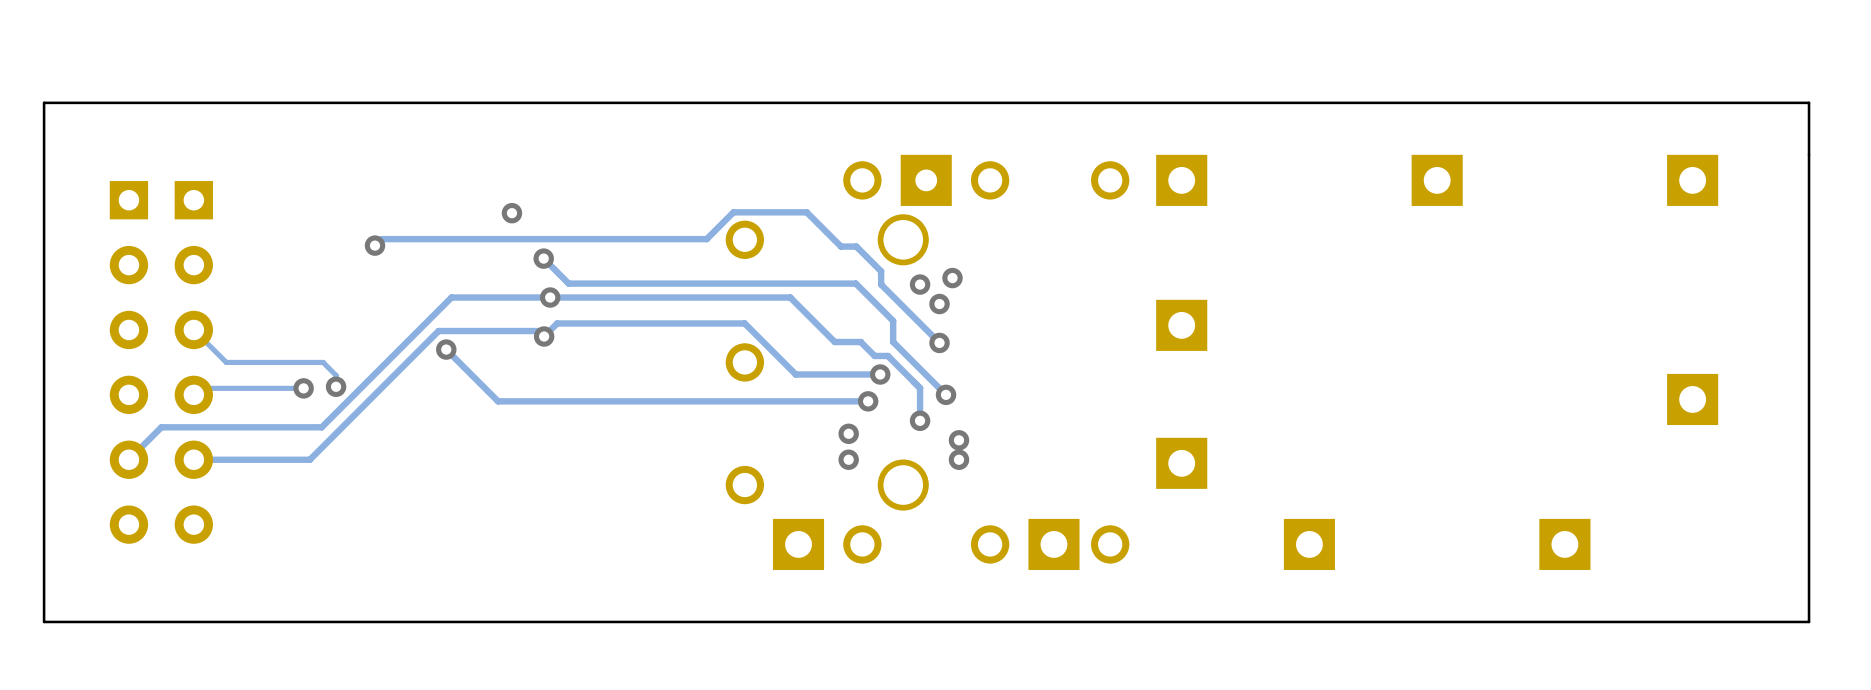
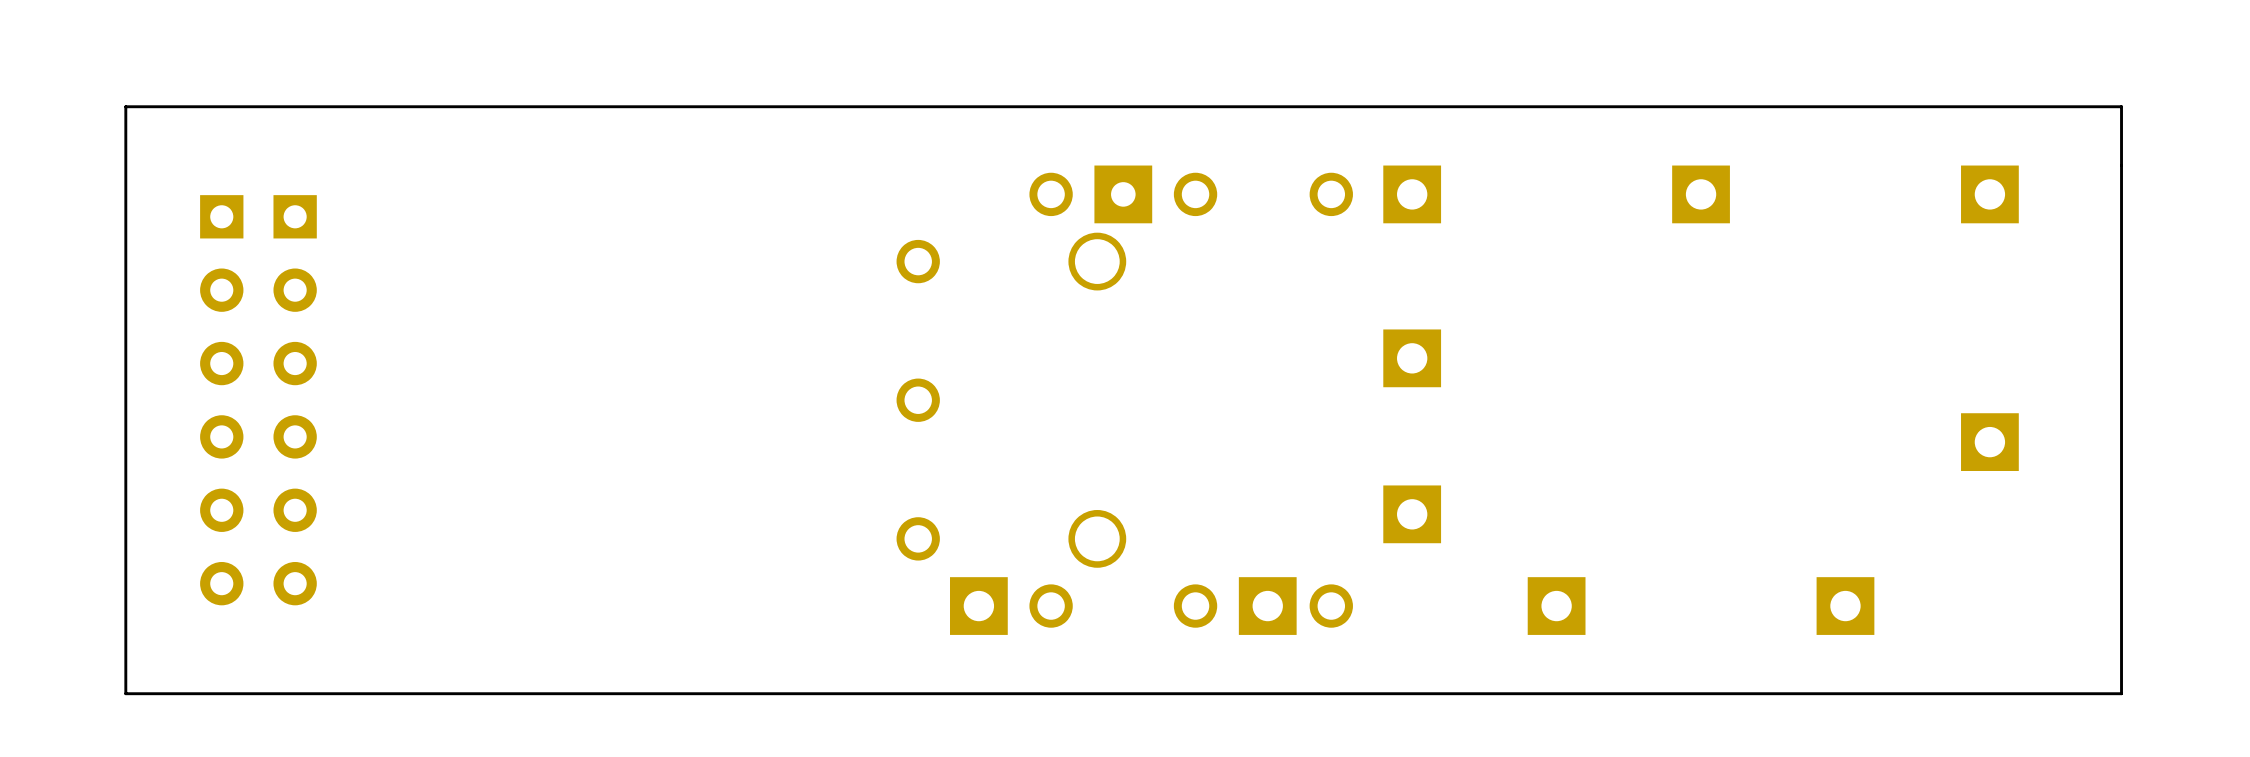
via: (511, 213) -> none
track: (375, 245) (381, 239) (706, 239) (733, 212) (806, 212) (841, 246) (856, 246) (881, 271) (881, 284) (939, 342) -> none
via: (375, 245) -> none
track: (543, 258) (568, 283) (855, 283) (893, 320) (893, 342) (946, 394) -> none
via: (543, 258) -> none
via: (952, 278) -> none
via: (920, 284) -> none
via: (550, 297) -> none
via: (939, 304) -> none
track: (193, 329) (226, 362) (323, 362) (336, 375) (336, 386) -> none
via: (544, 336) -> none
via: (939, 342) -> none
track: (446, 349) (498, 401) (868, 401) -> none
via: (446, 349) -> none
track: (880, 374) (795, 374) (744, 323) (557, 323) (544, 336) (538, 331) (438, 331) (309, 459) (193, 459) -> none
via: (880, 374) -> none
via: (336, 386) -> none
track: (303, 388) (200, 388) (193, 394) -> none
via: (303, 388) -> none
via: (946, 394) -> none
via: (868, 401) -> none
track: (920, 420) (920, 388) (887, 355) (874, 355) (860, 342) (834, 342) (790, 297) (451, 297) (321, 427) (161, 427) (128, 459) -> none
via: (920, 420) -> none
via: (848, 433) -> none
via: (958, 440) -> none
via: (848, 459) -> none
via: (958, 459) -> none

